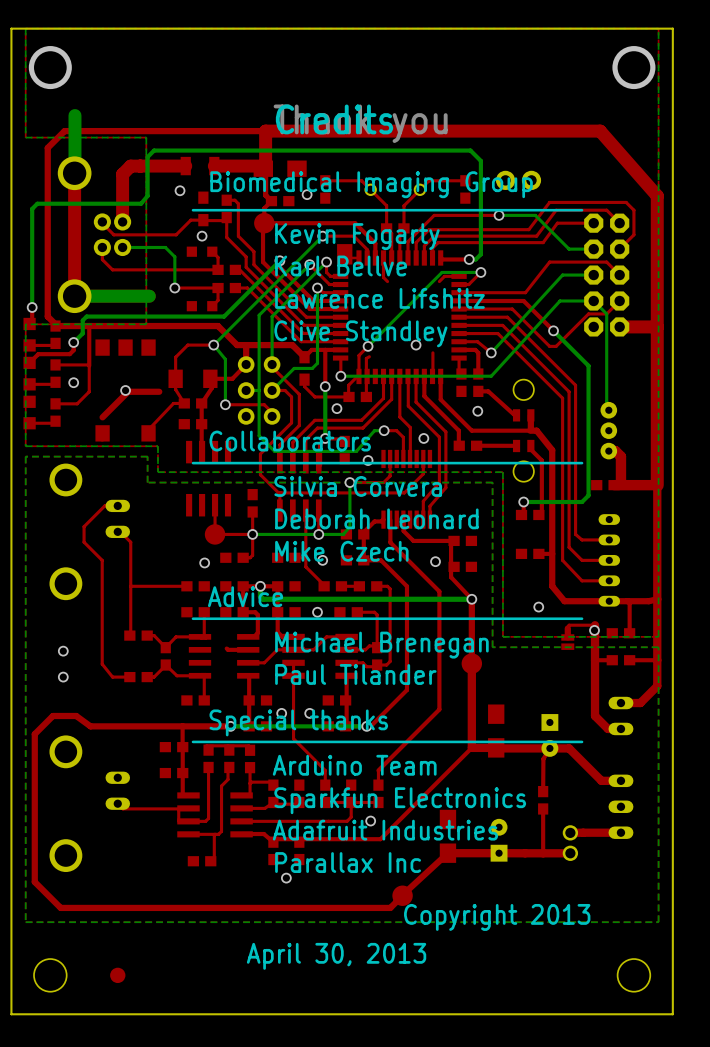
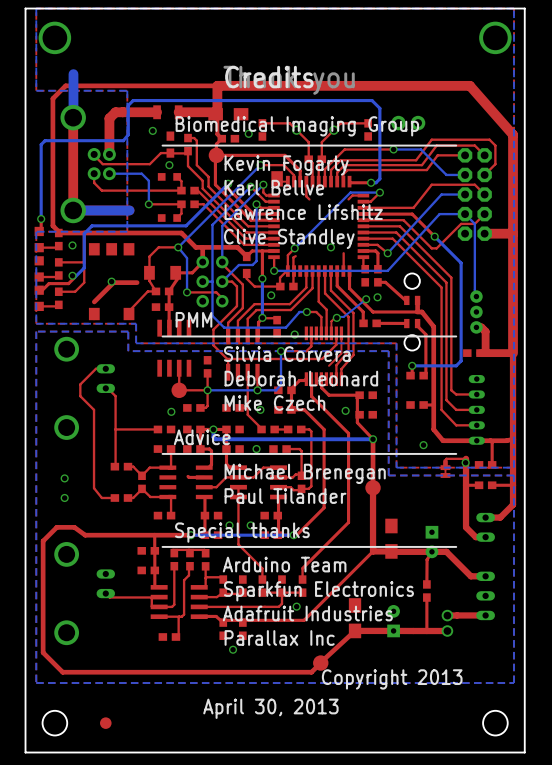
bottom track: (99, 316) (86, 316) (82, 320) (82, 333) (73, 342) -> (92, 225) (84, 233) (84, 267) (74, 277)
top track: (73, 342) (73, 350) (69, 354) (38, 354) (29, 362) -> none
top track: none -> (74, 277) (68, 283) (49, 283) (42, 290) (39, 290)
bottom track: none -> (366, 299) (343, 316) (335, 316)
via: none -> (366, 299)
top track: none -> (335, 316) (331, 321) (331, 333)
text: Collaborators (290, 441) -> PMM (193, 319)
top track: none -> (341, 333) (341, 353) (328, 365)
part footprint: [561, 634, 575, 650] -> [440, 465, 451, 478]

